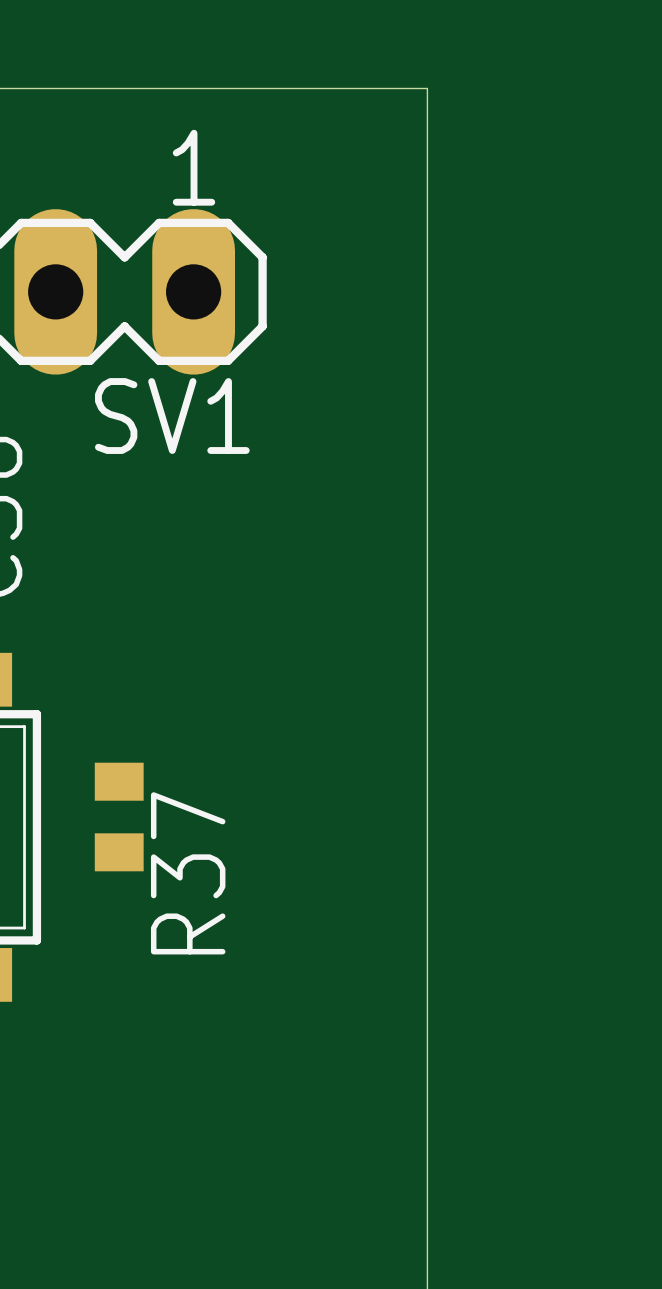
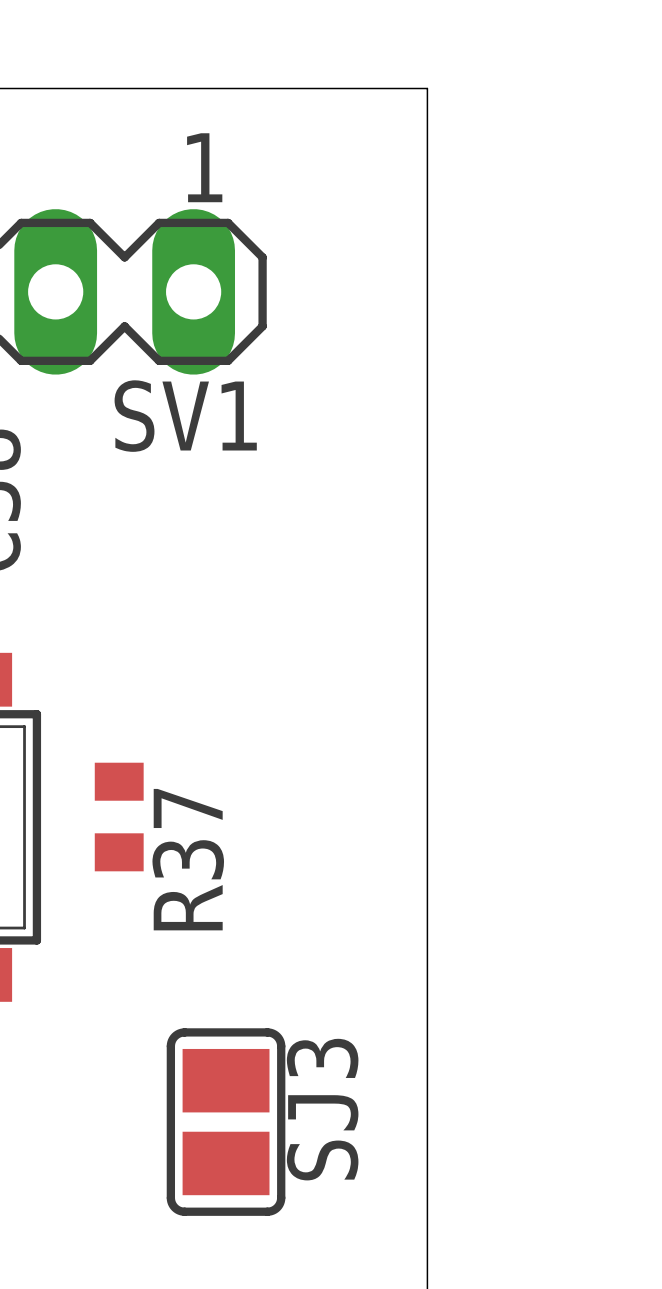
SJ3: none -> (226, 1122)

